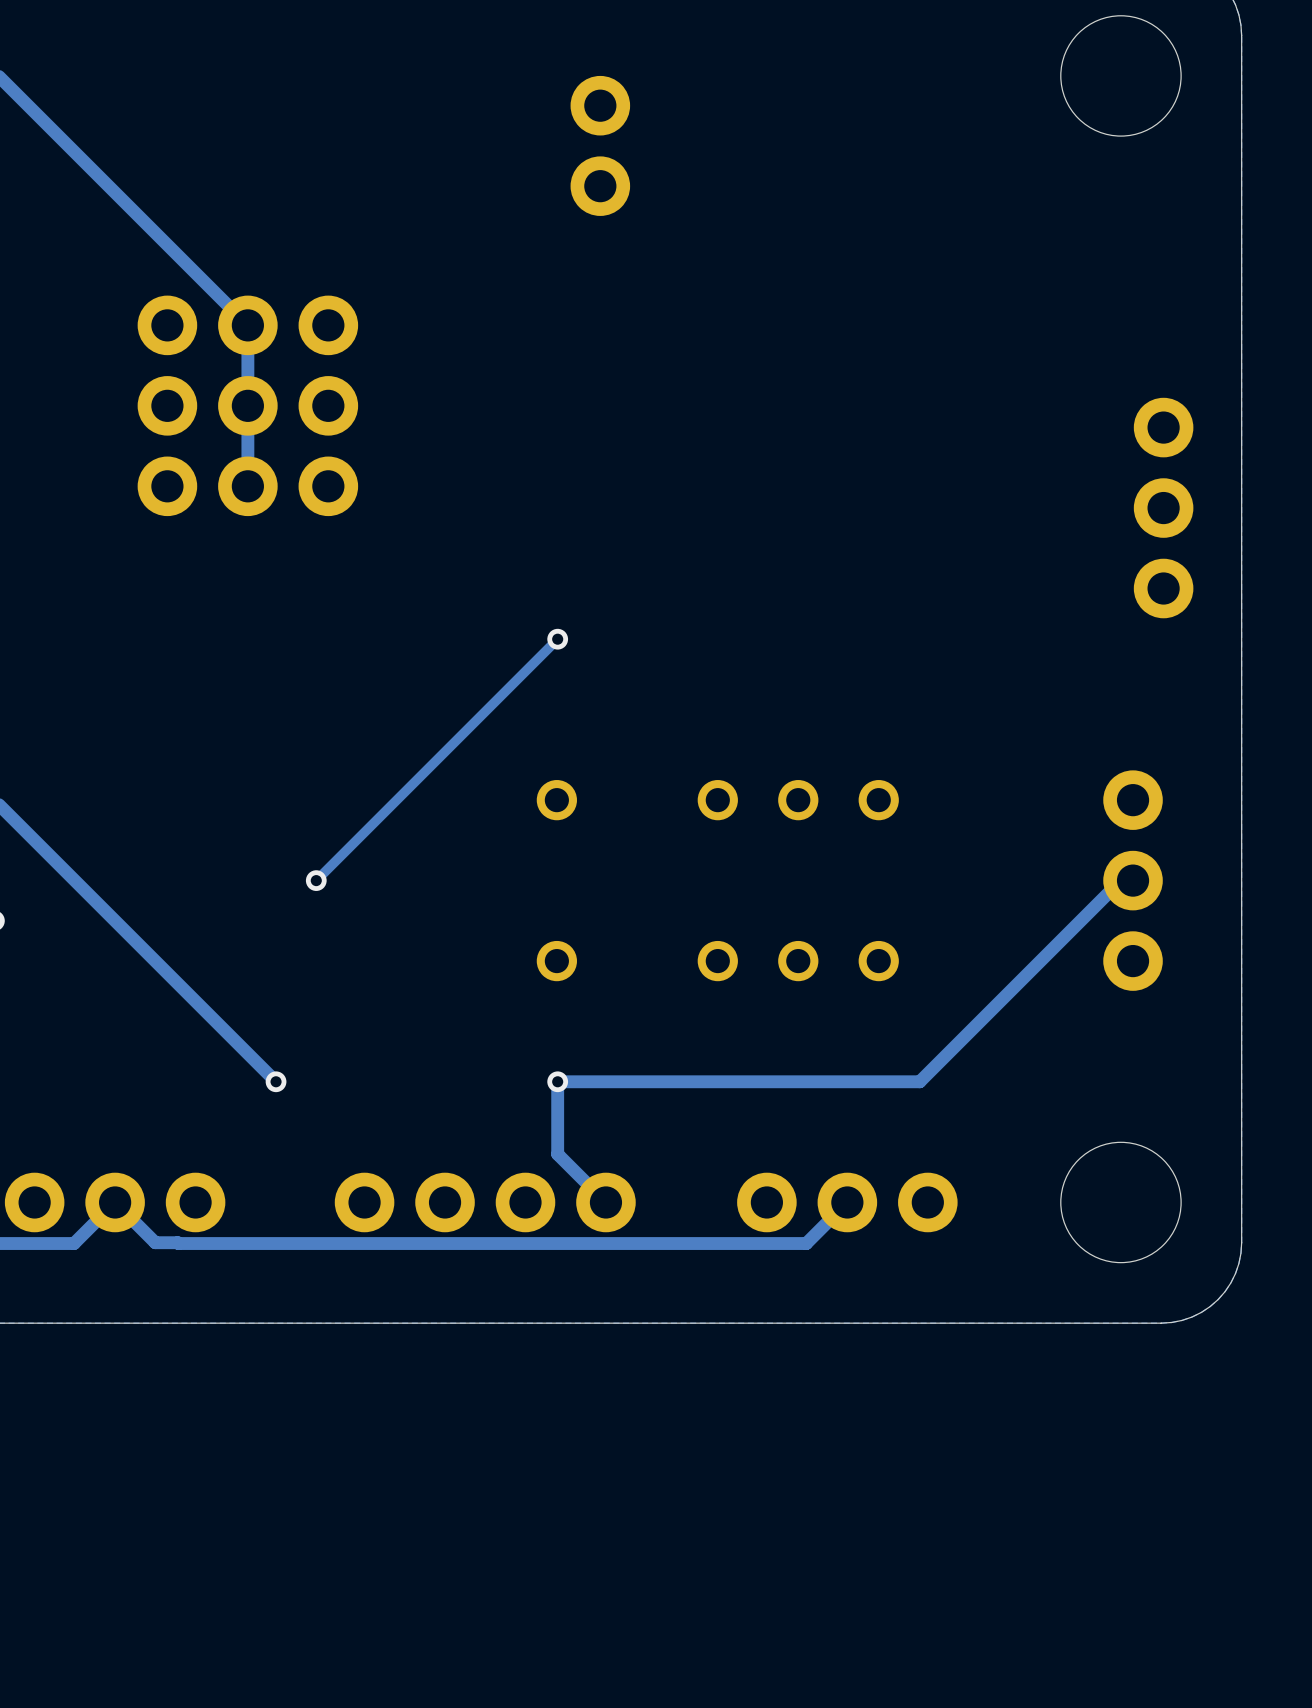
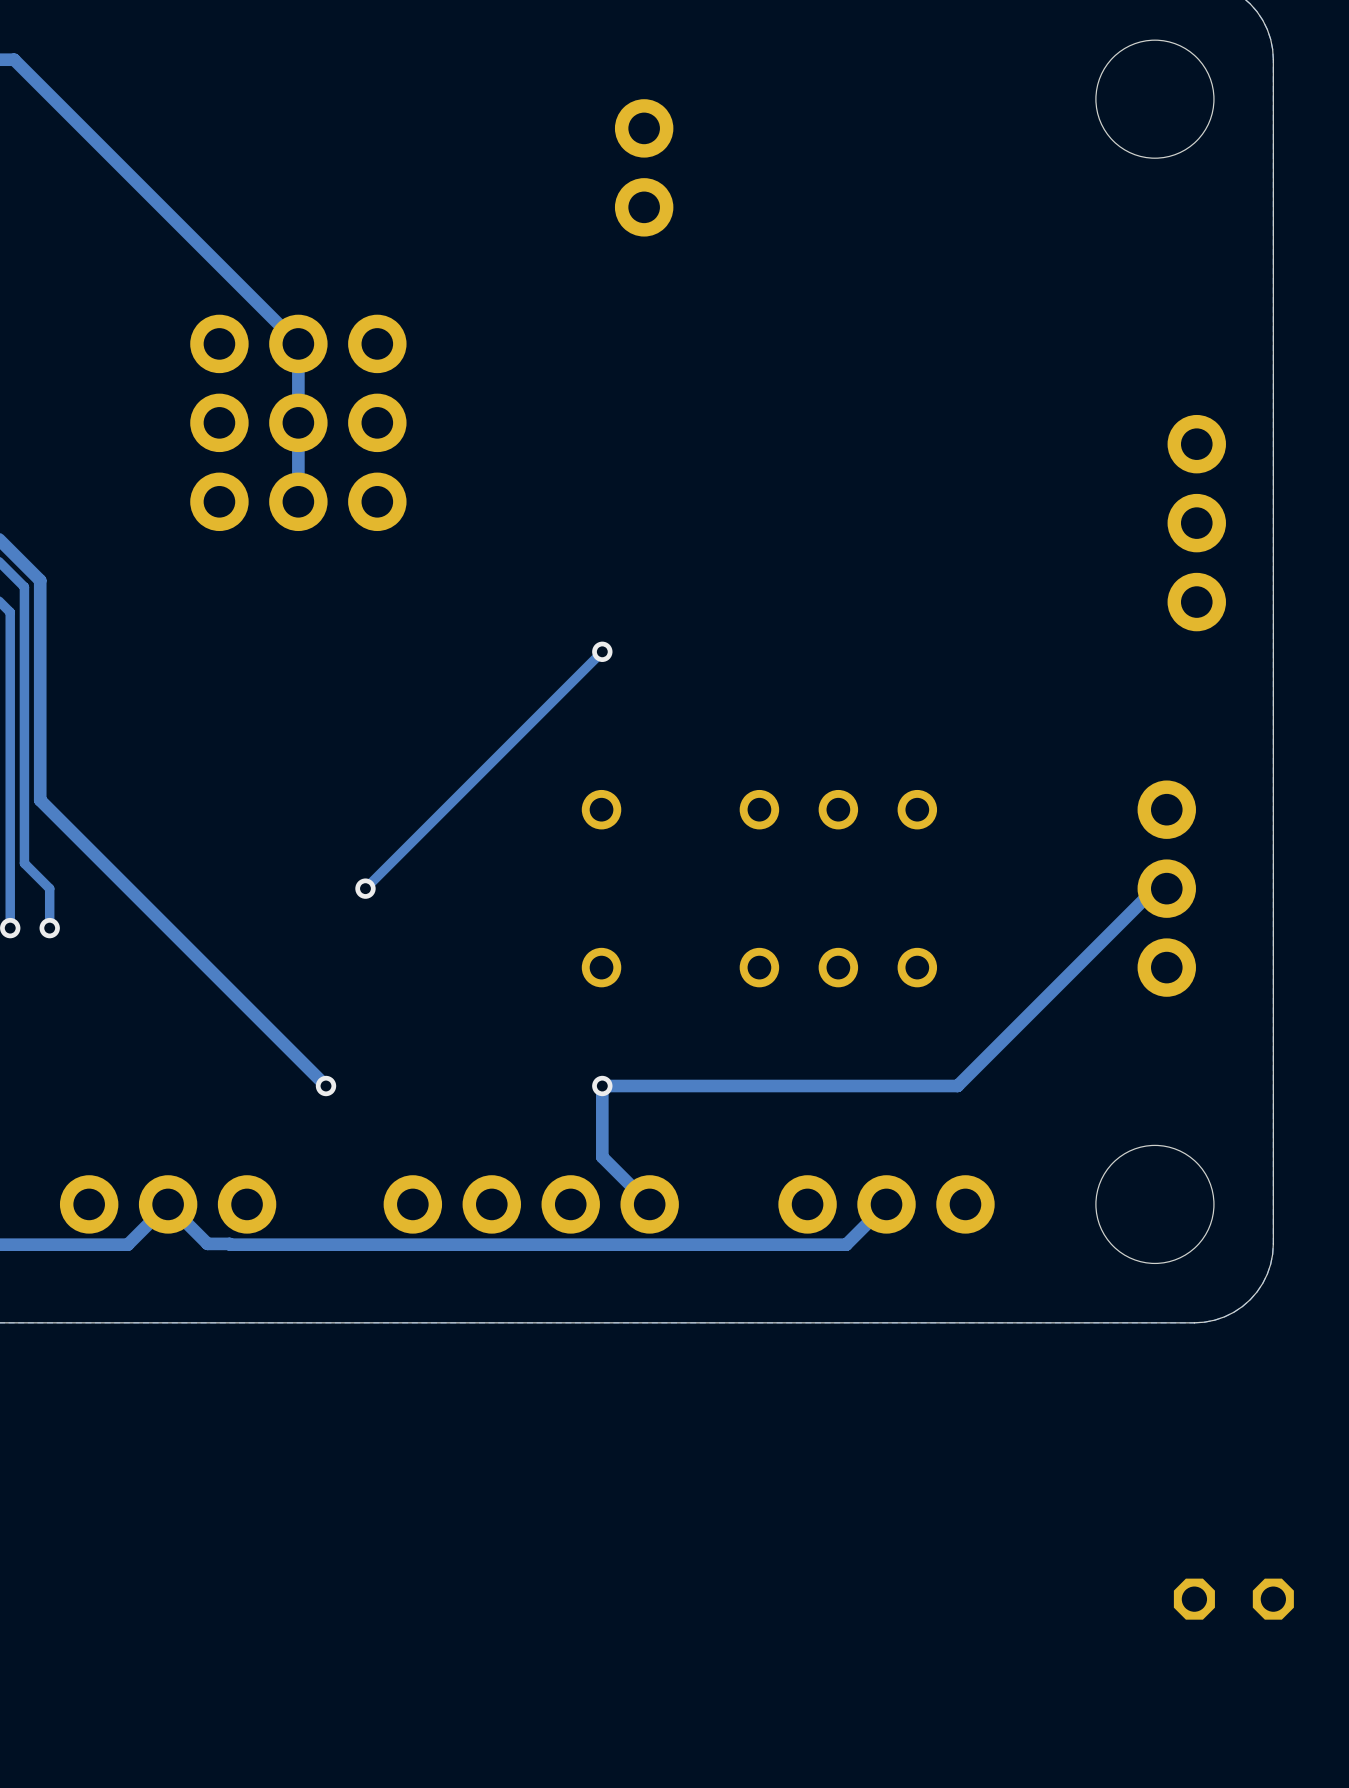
part: none -> (1233, 1599)

